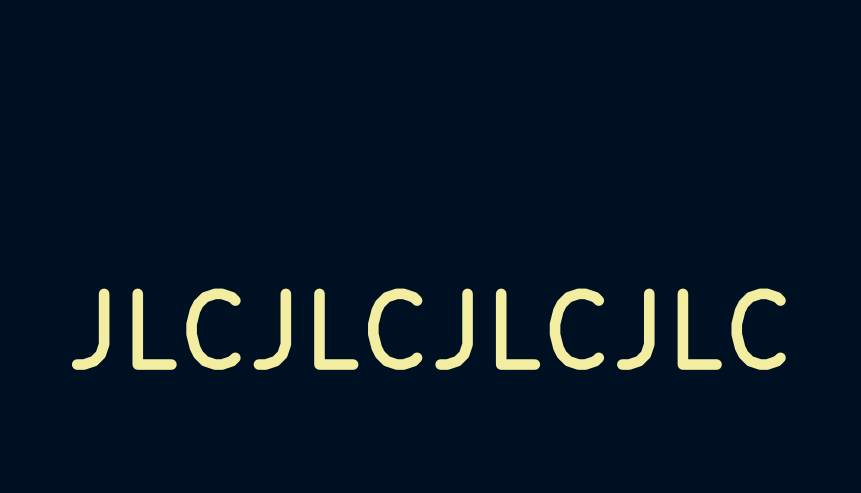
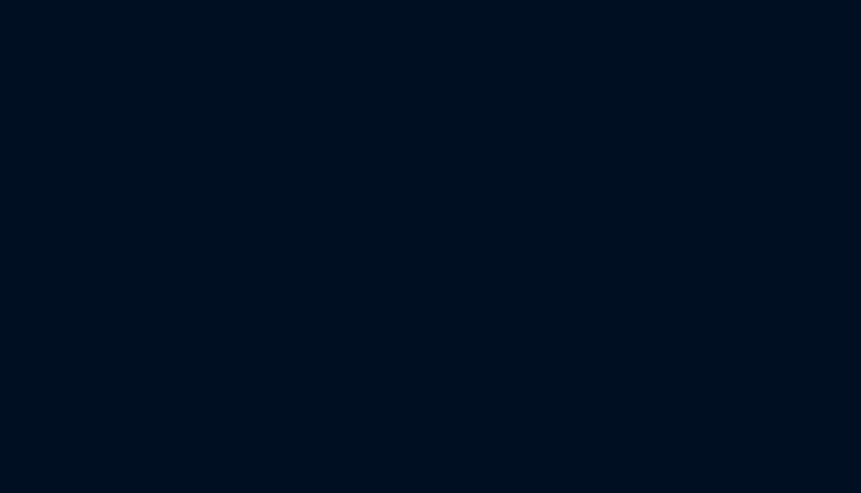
text: JLCJLCJLCJLC (428, 329) -> none

